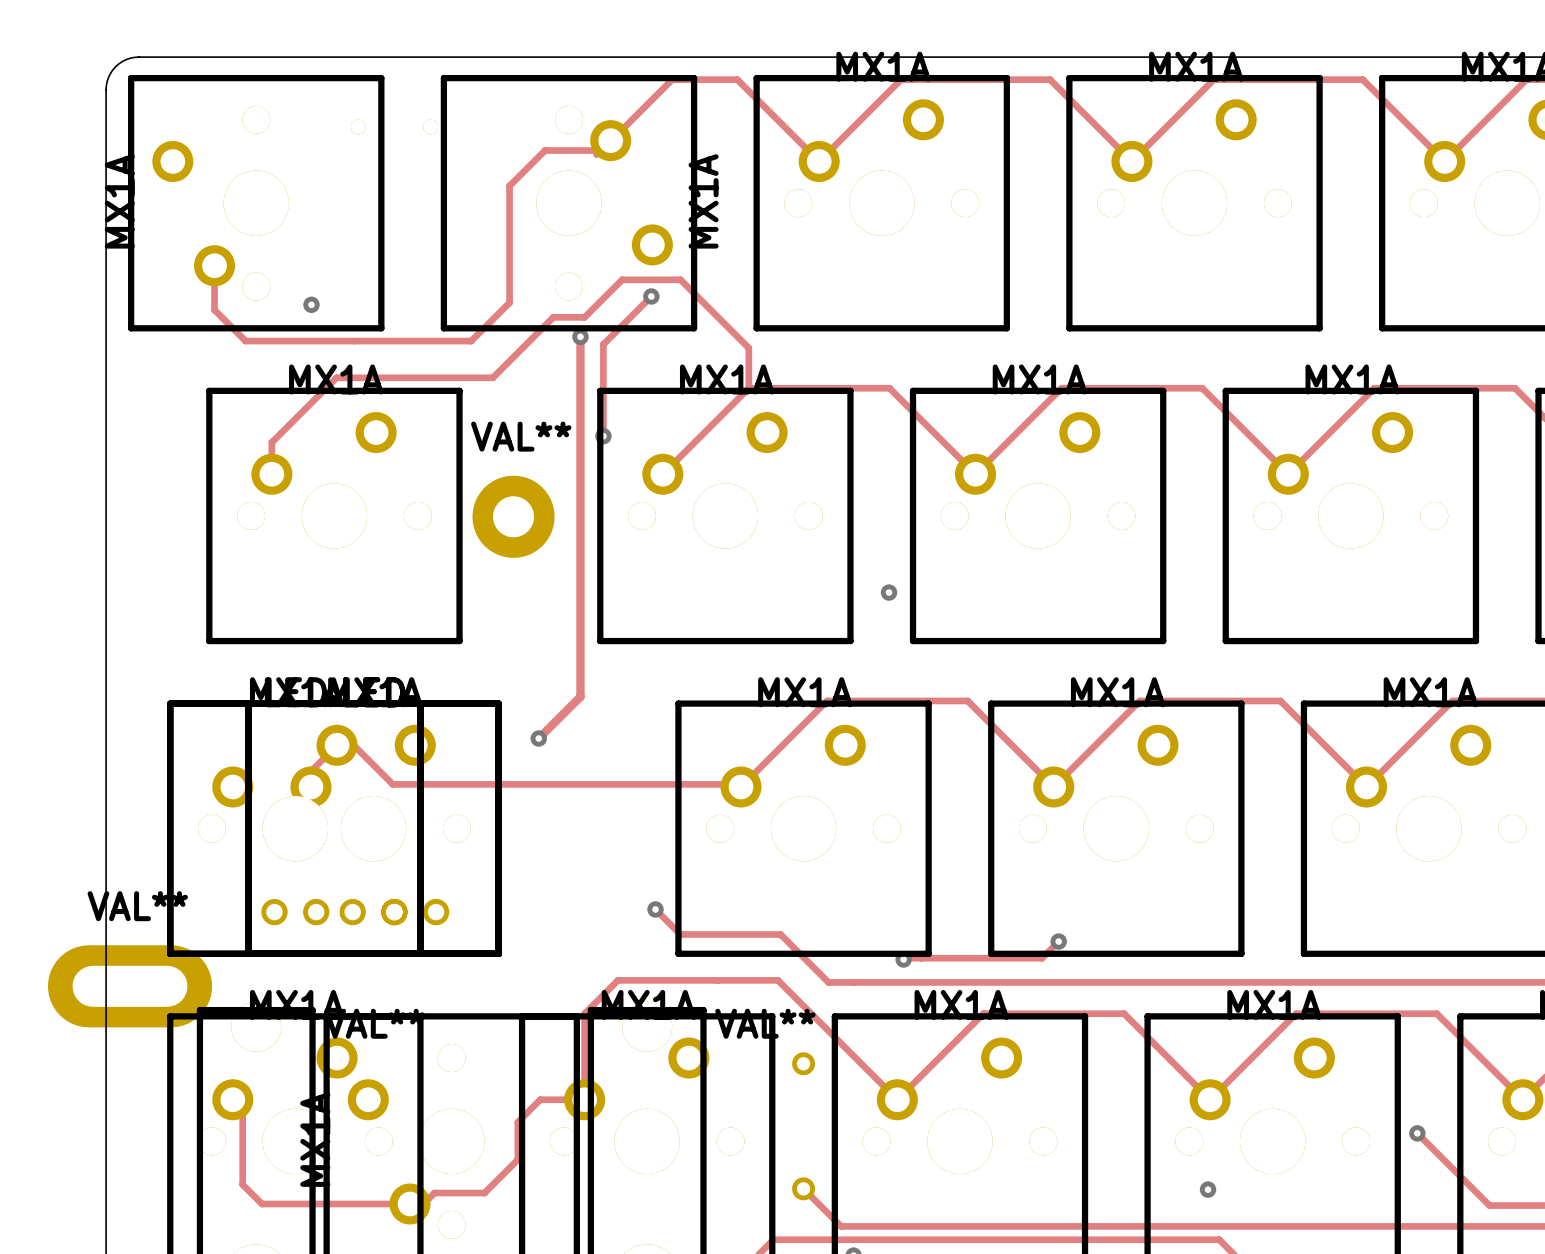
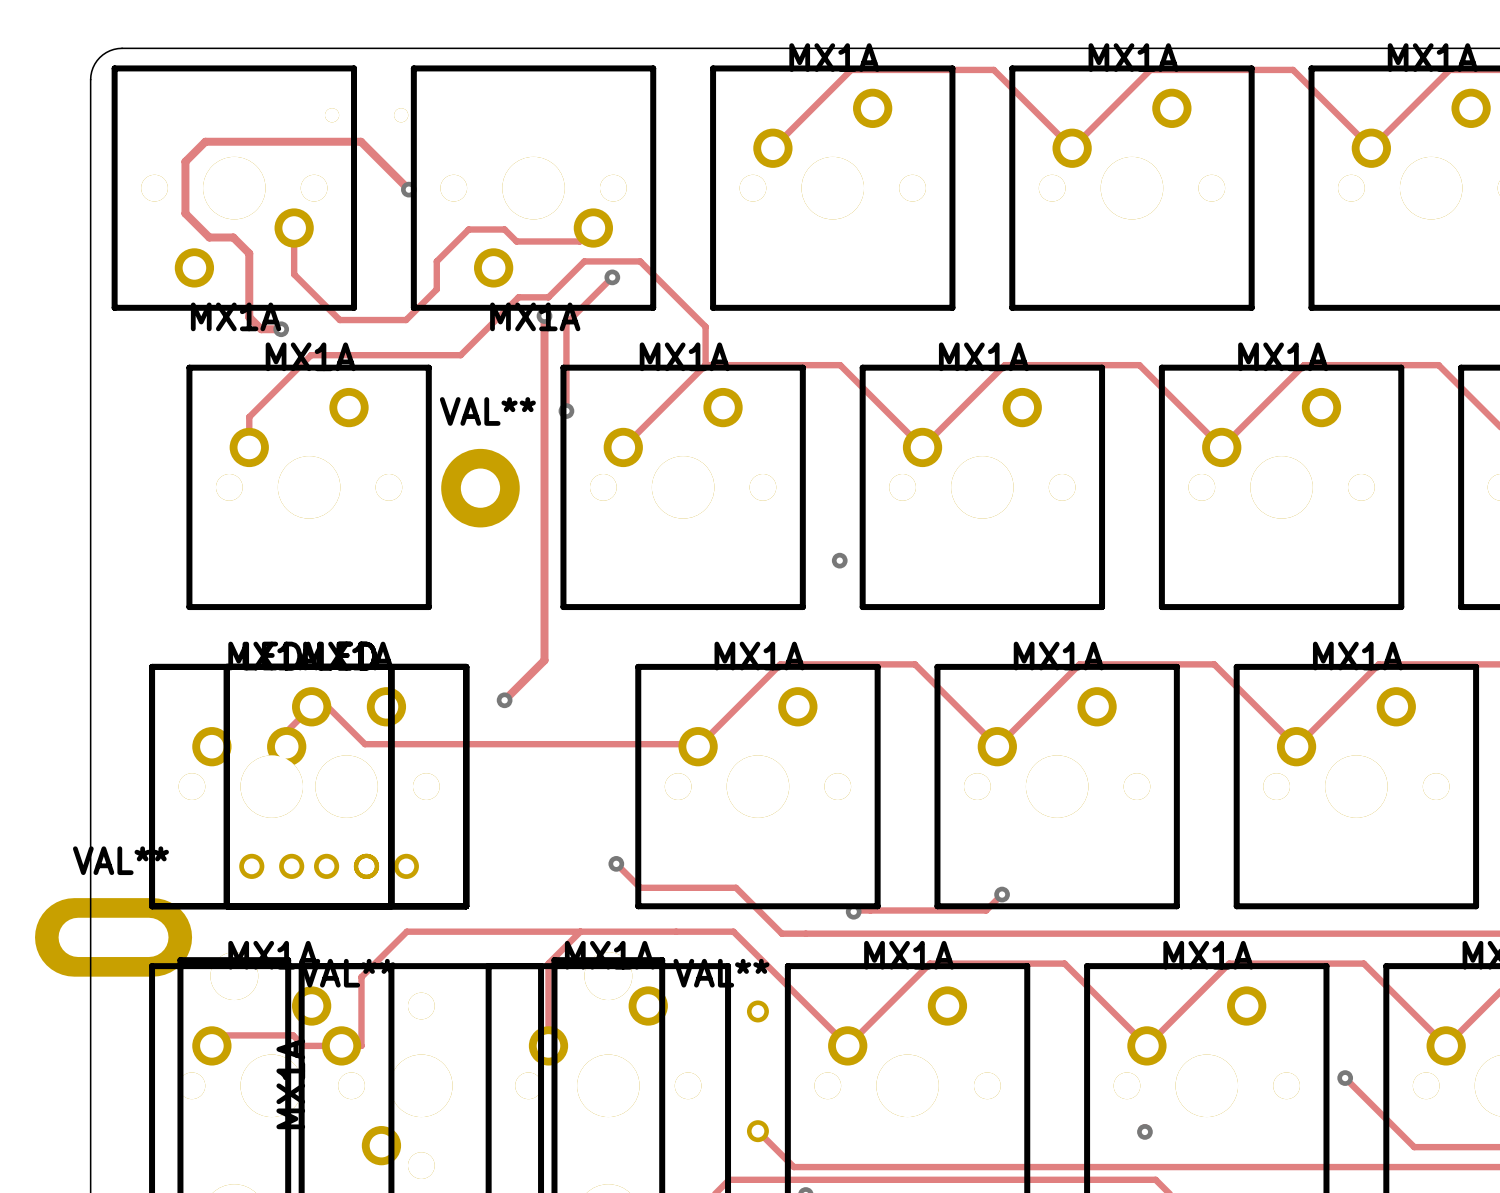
track: (596, 150) (545, 150) (509, 185) (509, 302) (471, 341) (435, 341) -> (593, 228) (579, 241) (516, 241) (504, 229) (468, 229) (436, 261) (436, 289) (406, 320)
track: (596, 154) (672, 79) (737, 79) (819, 161) -> none
part rotation: 0° (256, 203) -> 90° counterclockwise (234, 188)
part rotation: 0° (568, 203) -> 90° clockwise (533, 188)
track: none -> (408, 189) (360, 141) (205, 141) (185, 161) (185, 213) (209, 237) (233, 237) (249, 253) (249, 317) (261, 329) (281, 329)
via: none -> (408, 189)
track: (214, 265) (214, 310) (245, 341) (366, 341) -> (294, 228) (294, 274) (339, 320)
via position: (311, 304) -> (281, 329)
track: (232, 1099) (242, 1109) (242, 1184) (262, 1204) (423, 1204) (434, 1193) (484, 1193) (517, 1159) (517, 1122) (540, 1099) (584, 1099) -> (211, 1045) (222, 1035) (293, 1035) (303, 1045) (361, 1045) (361, 977) (406, 931) (580, 931)

